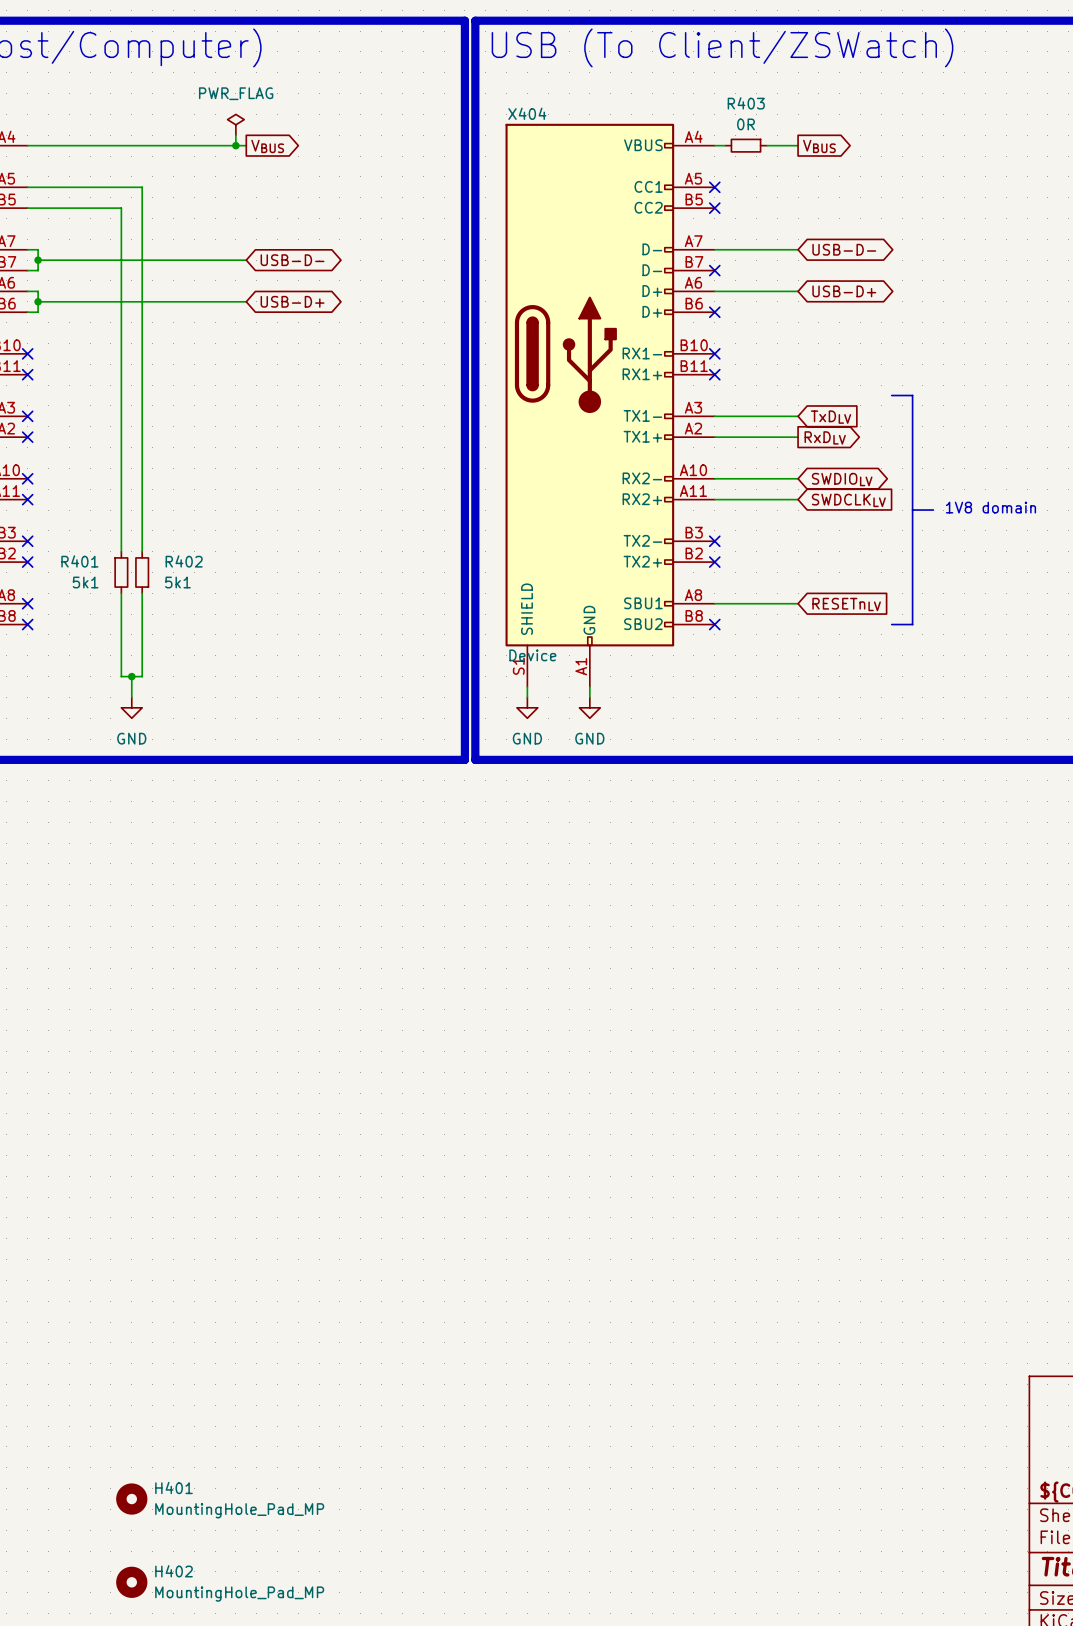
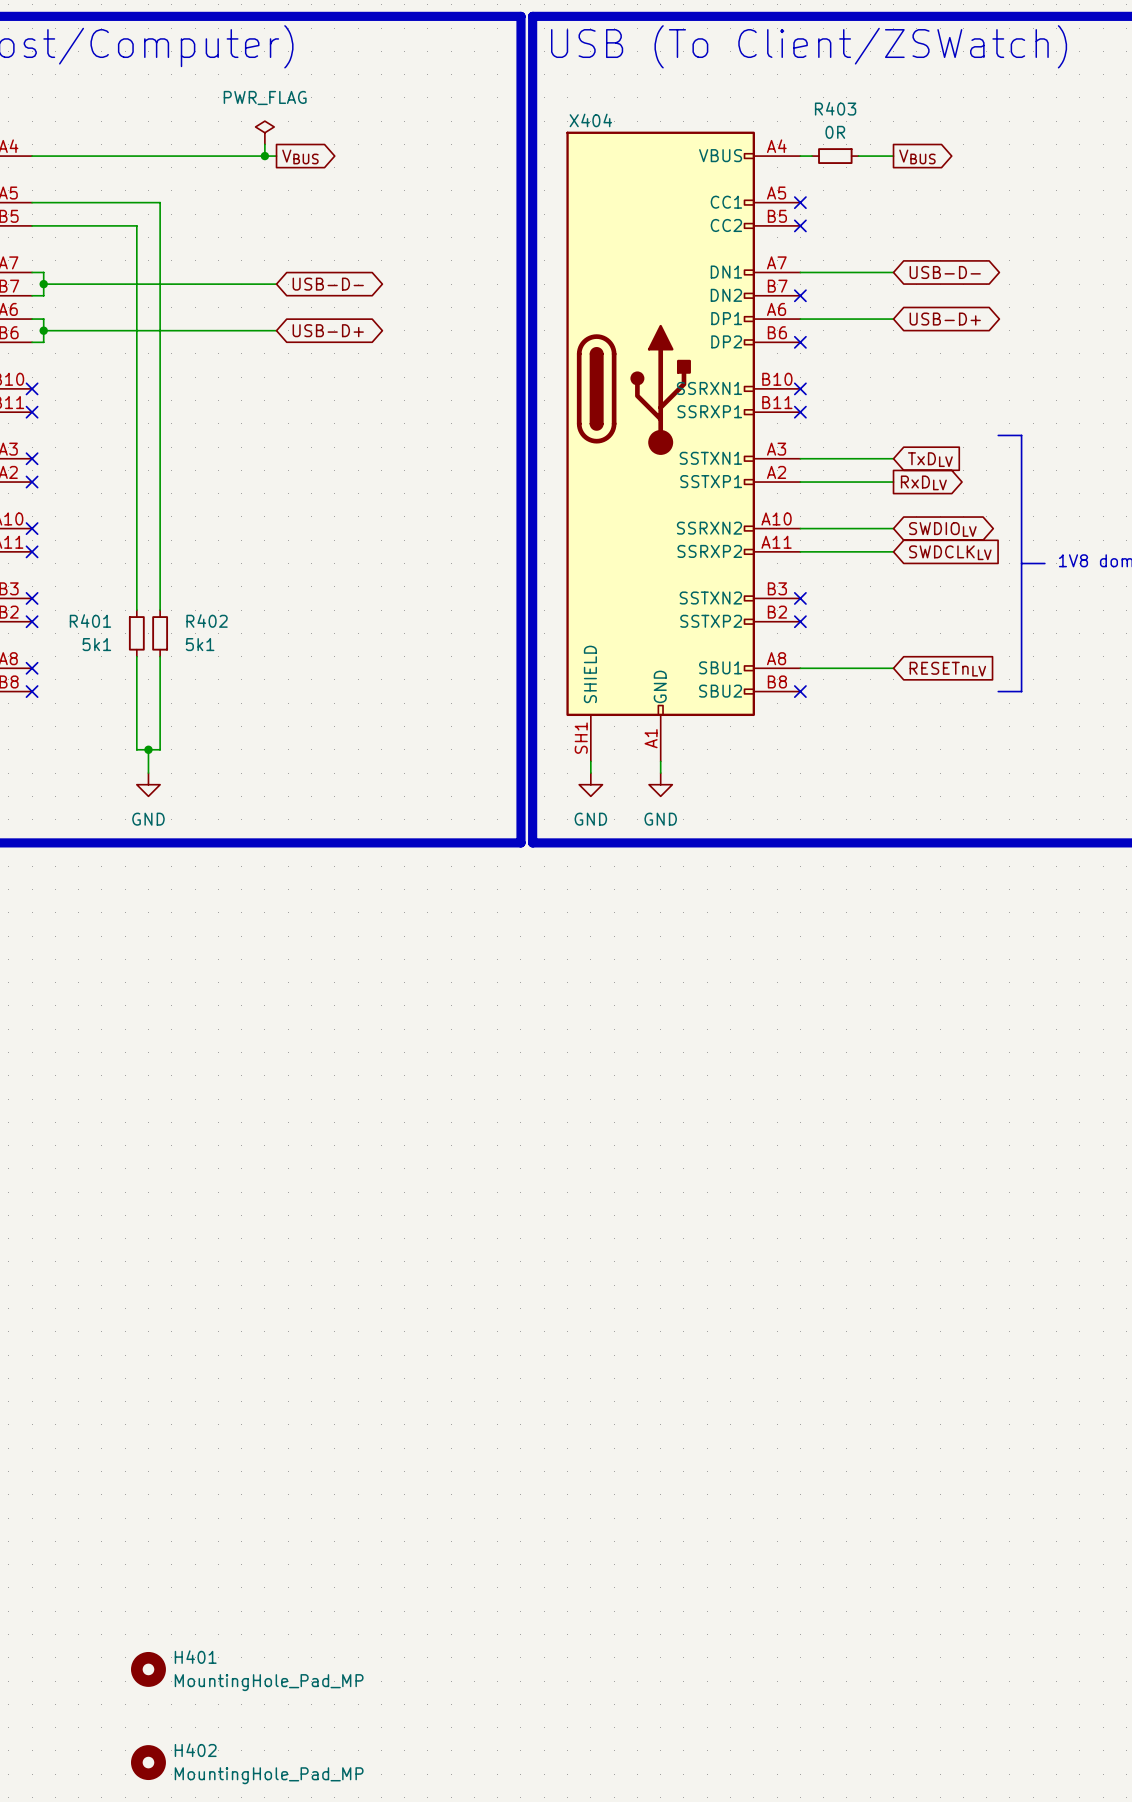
X404 symbol: [505, 123, 715, 688] -> [566, 131, 801, 762]
X404 value: Device (532, 655) -> none

